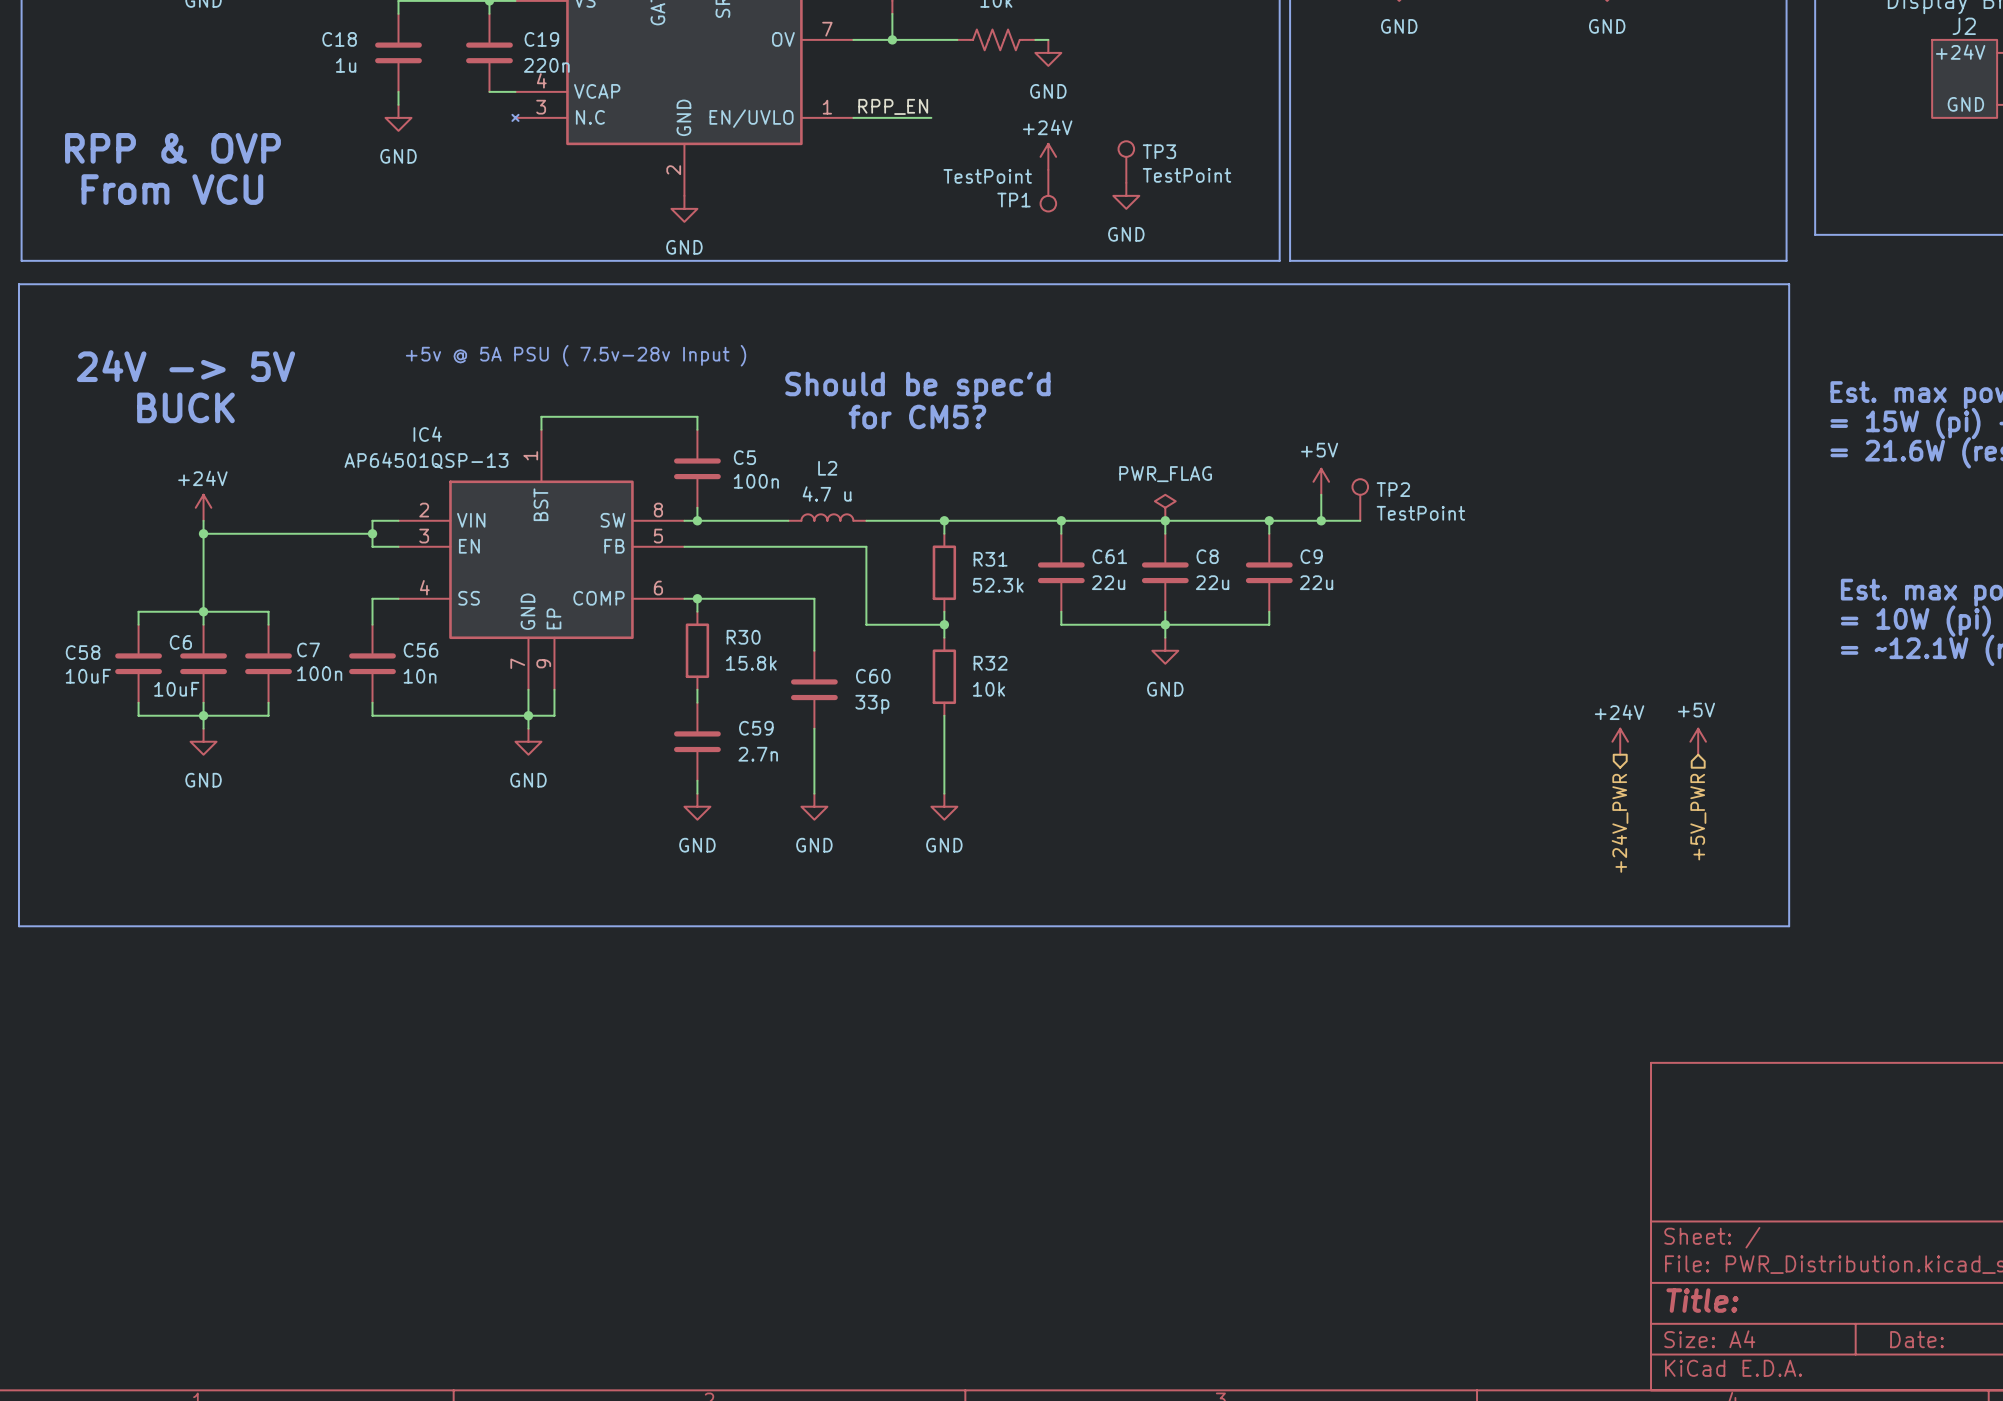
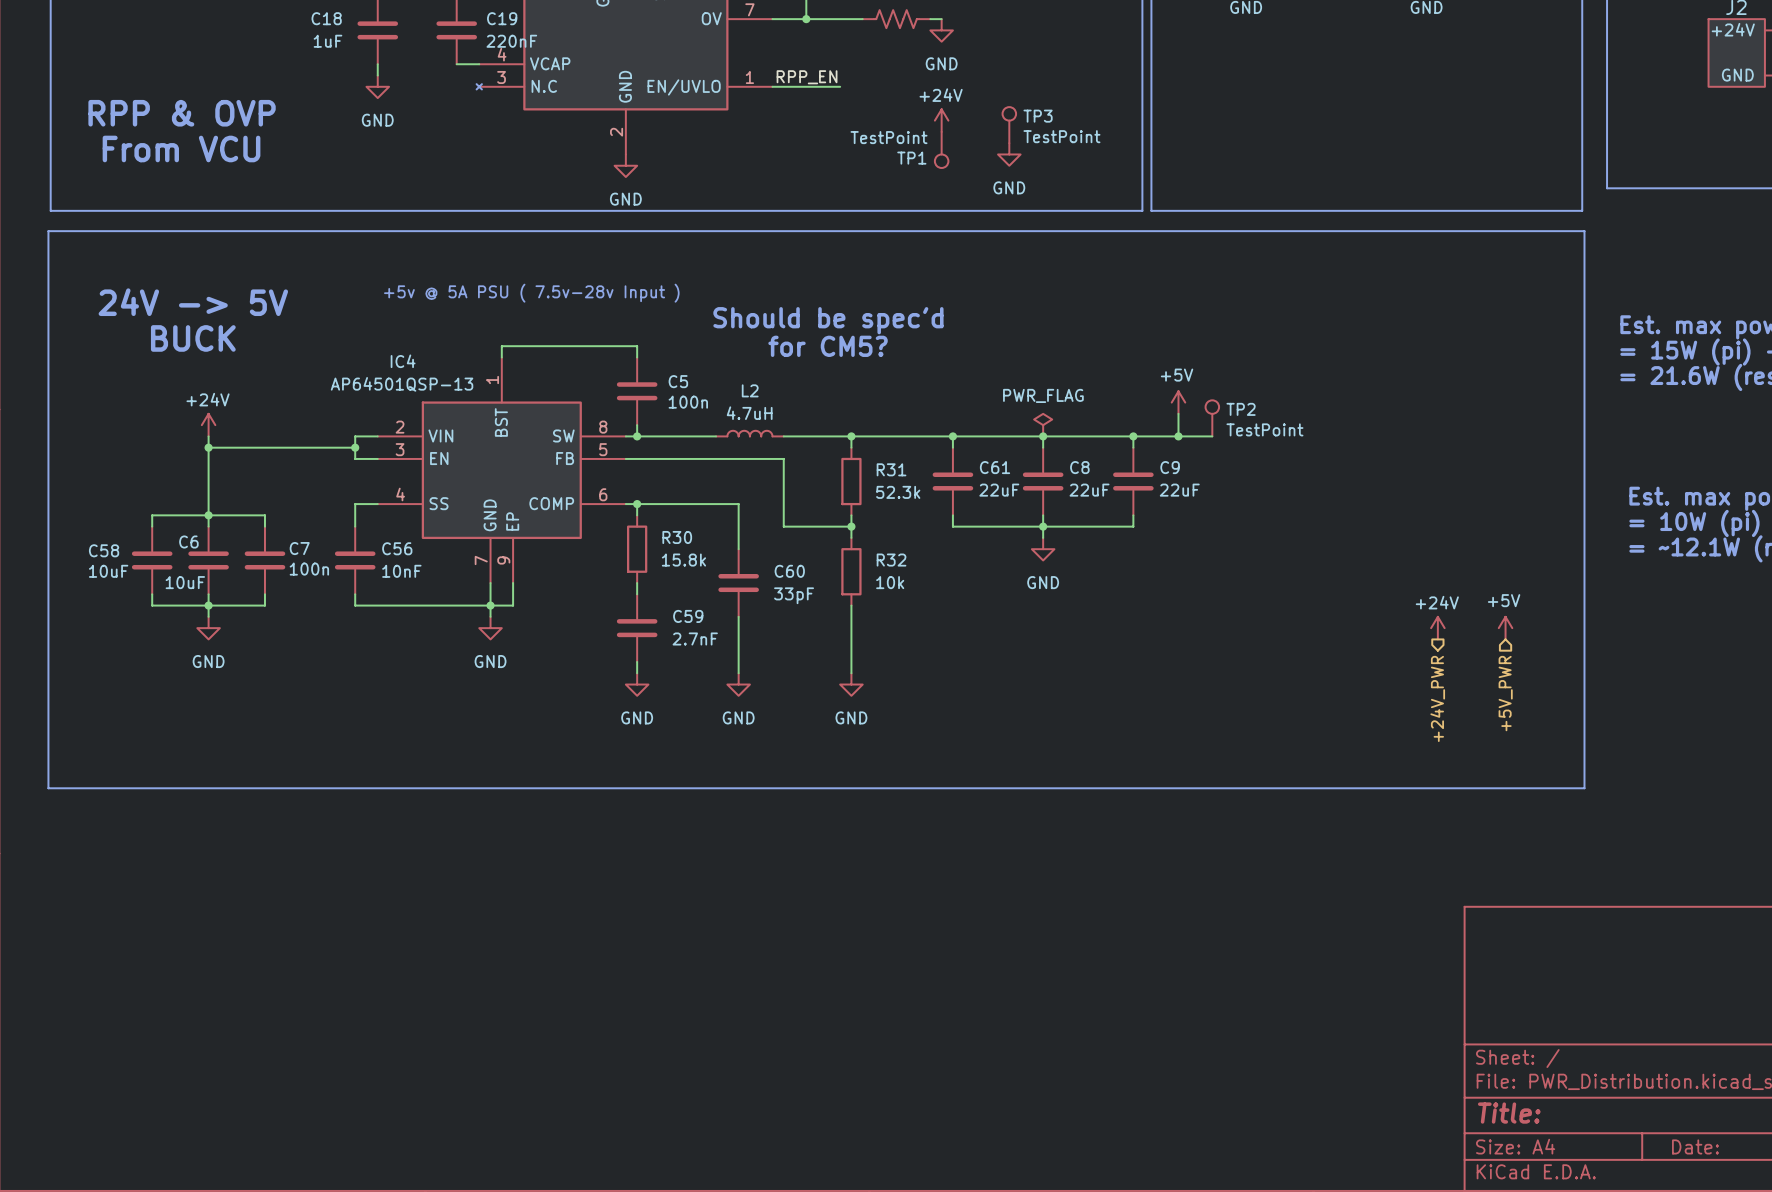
C18 value: 1u (346, 65) -> 1uF (328, 41)
C19 value: 220n (546, 65) -> 220nF (511, 41)
L2 value: 4.7 u (827, 493) -> 4.7uH (749, 413)
C61 value: 22u (1108, 582) -> 22uF (999, 490)
C8 value: 22u (1212, 582) -> 22uF (1089, 490)
C9 value: 22u (1316, 582) -> 22uF (1179, 490)
C56 value: 10n (420, 676) -> 10nF (401, 571)
C60 value: 33p (872, 704) -> 33pF (794, 595)
C59 value: 2.7n (758, 754) -> 2.7nF (695, 638)

